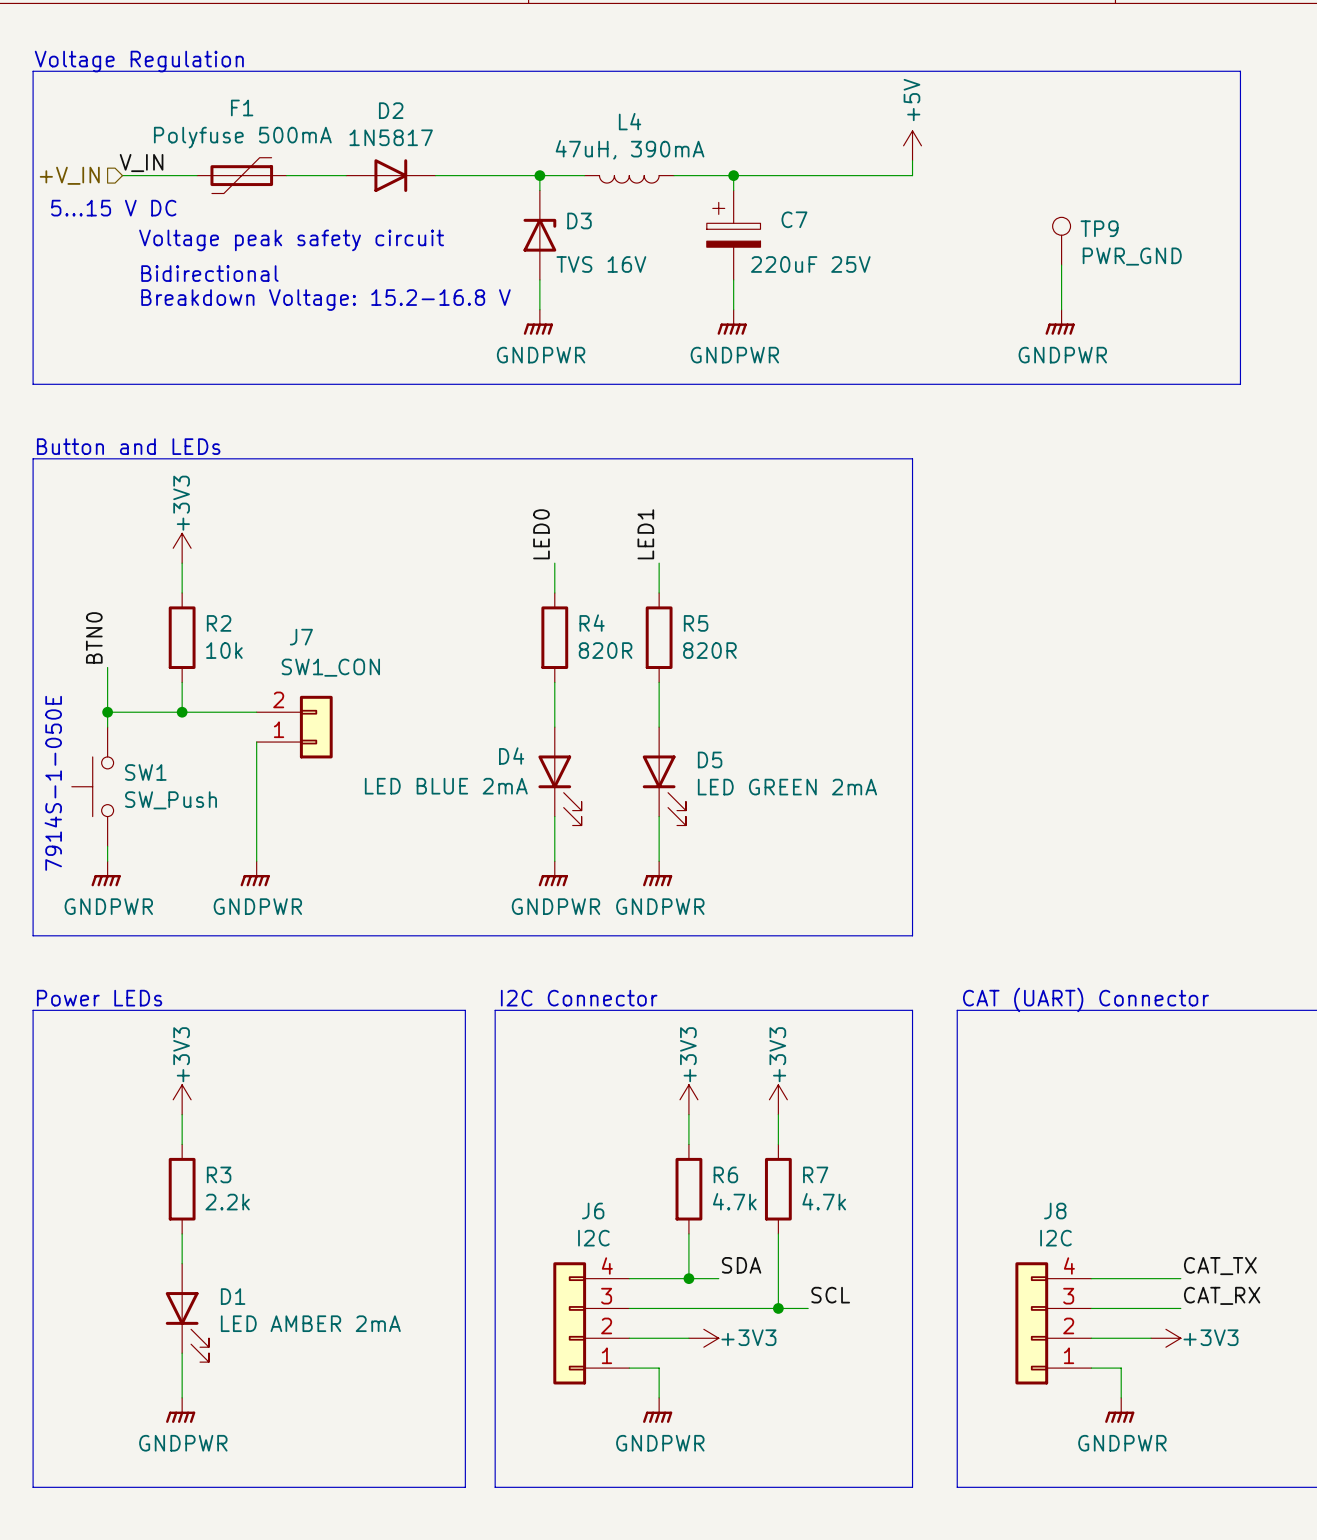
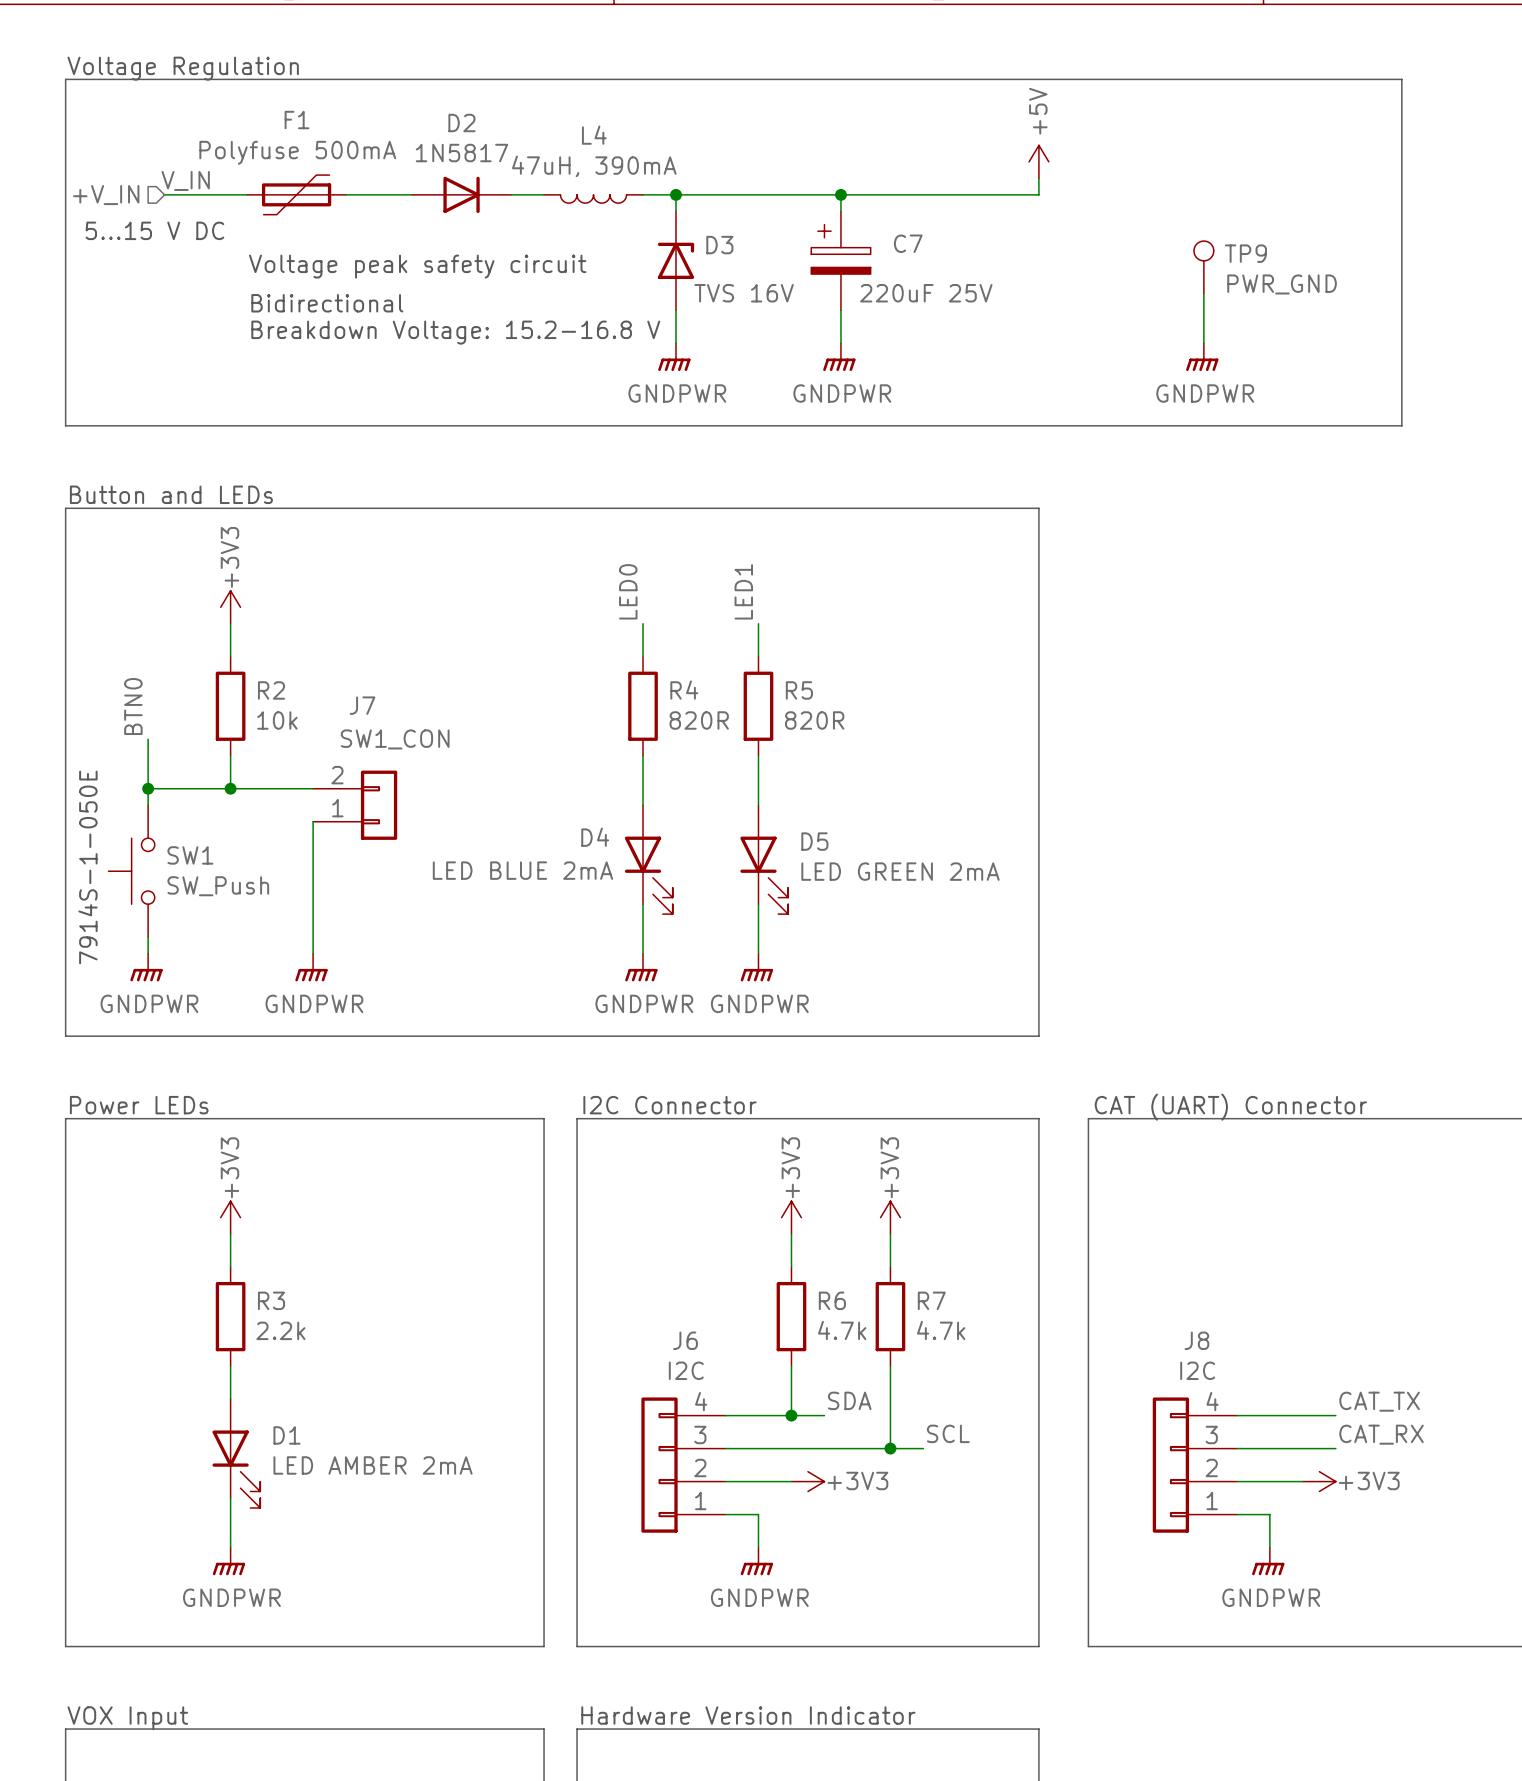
wire: (465, 175) (554, 175) -> none
wire: (539, 175) (539, 190) -> none
junction position: (539, 175) -> (676, 194)
wire: none -> (774, 194) (676, 194) (676, 211)
L4 position: (629, 179) -> (593, 199)
D3 position: (539, 235) -> (676, 260)
text position: Voltage peak safety circuit (291, 240) -> Voltage peak safety circuit (417, 266)
text position: Bidirectional (209, 273) -> Bidirectional (327, 303)
wire: (539, 279) (539, 309) -> (676, 310) (676, 343)
text position: Breakdown Voltage: 15.2-16.8 V (325, 300) -> Breakdown Voltage: 15.2-16.8 V (455, 332)
power symbol position: GNDPWR (538, 322) -> GNDPWR (674, 357)

